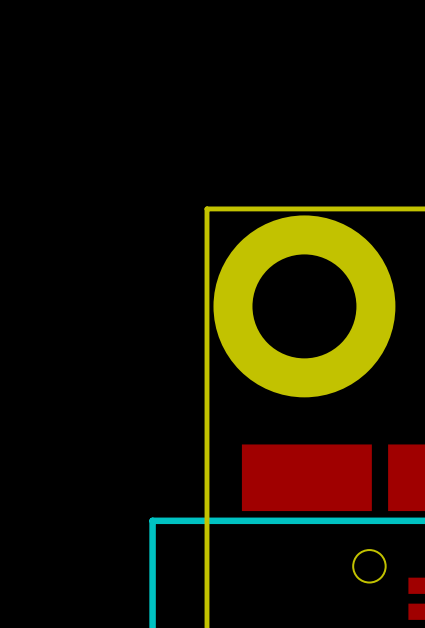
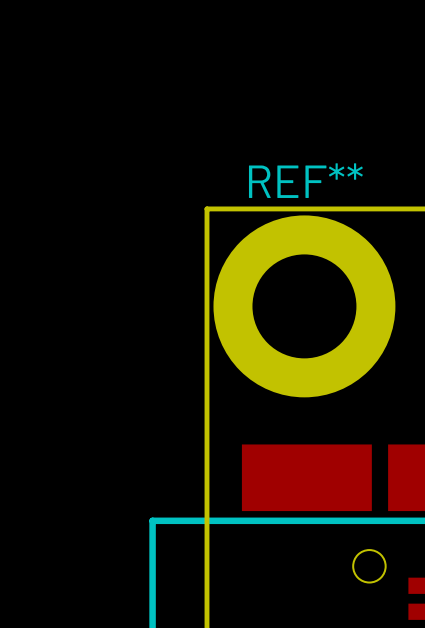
REF** name: none -> REF** (305, 180)

